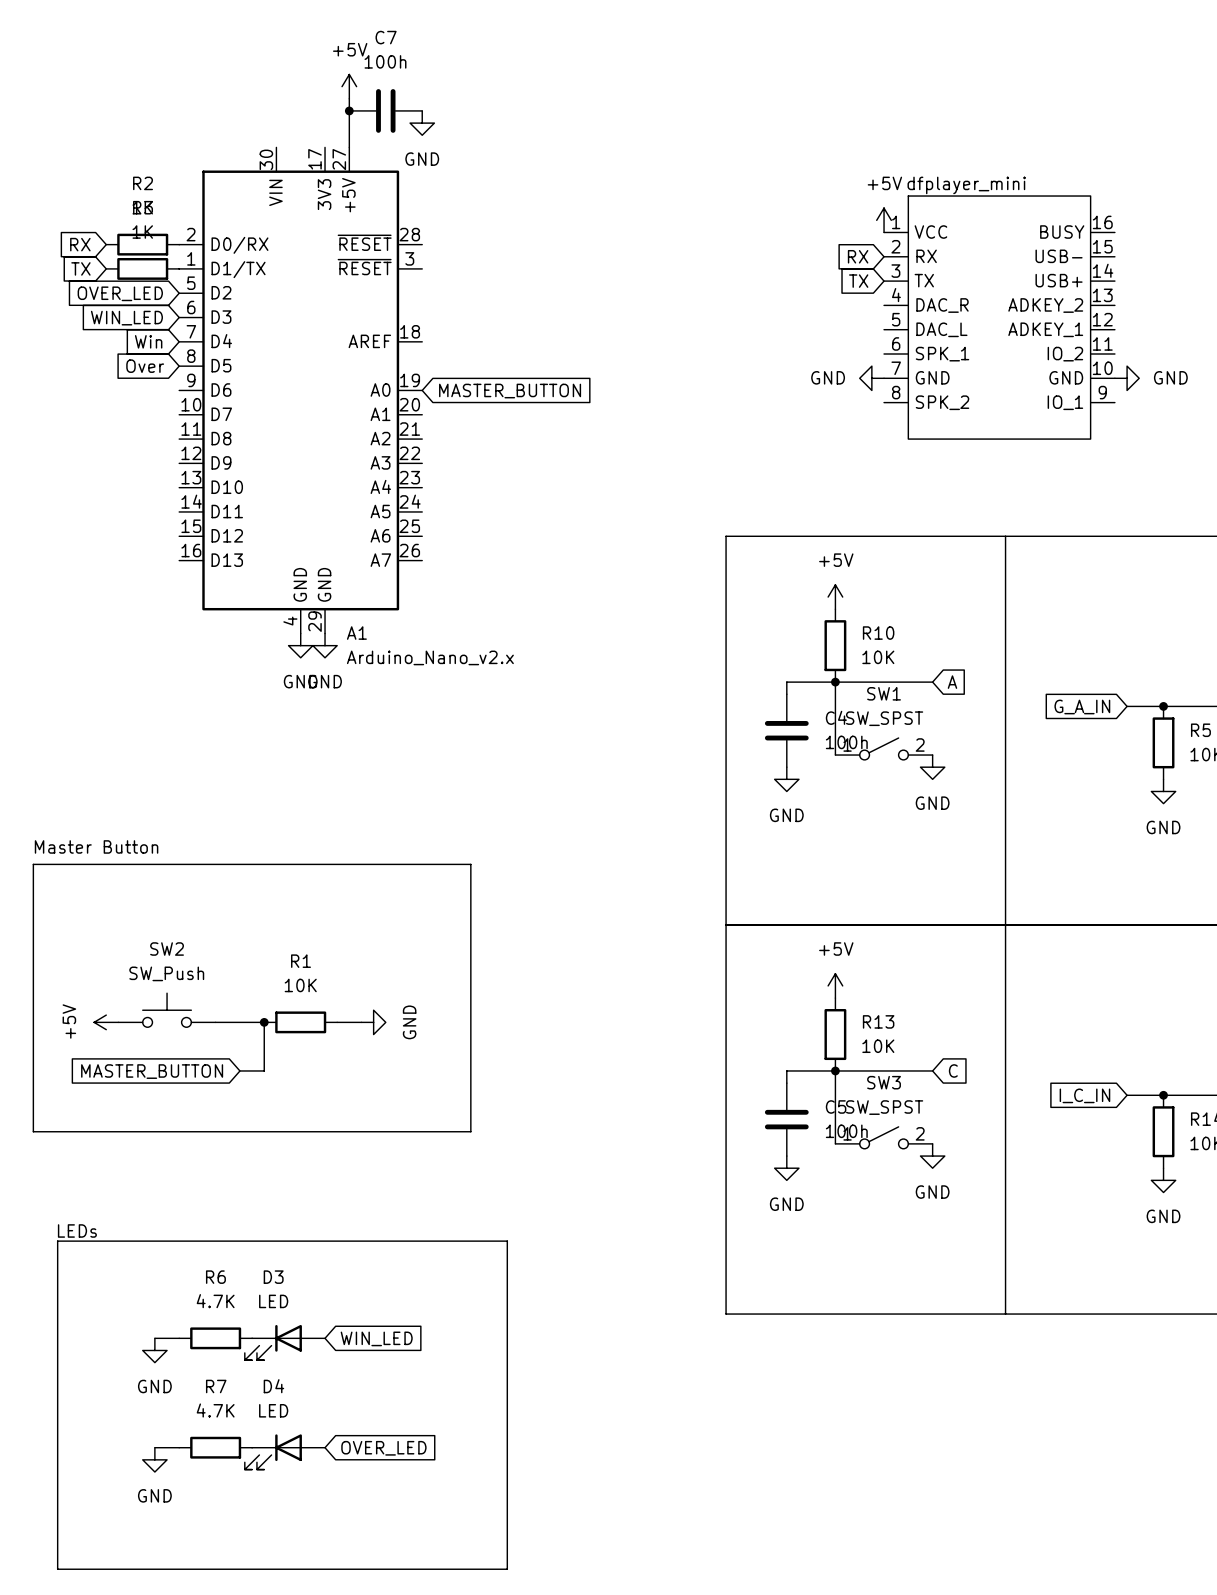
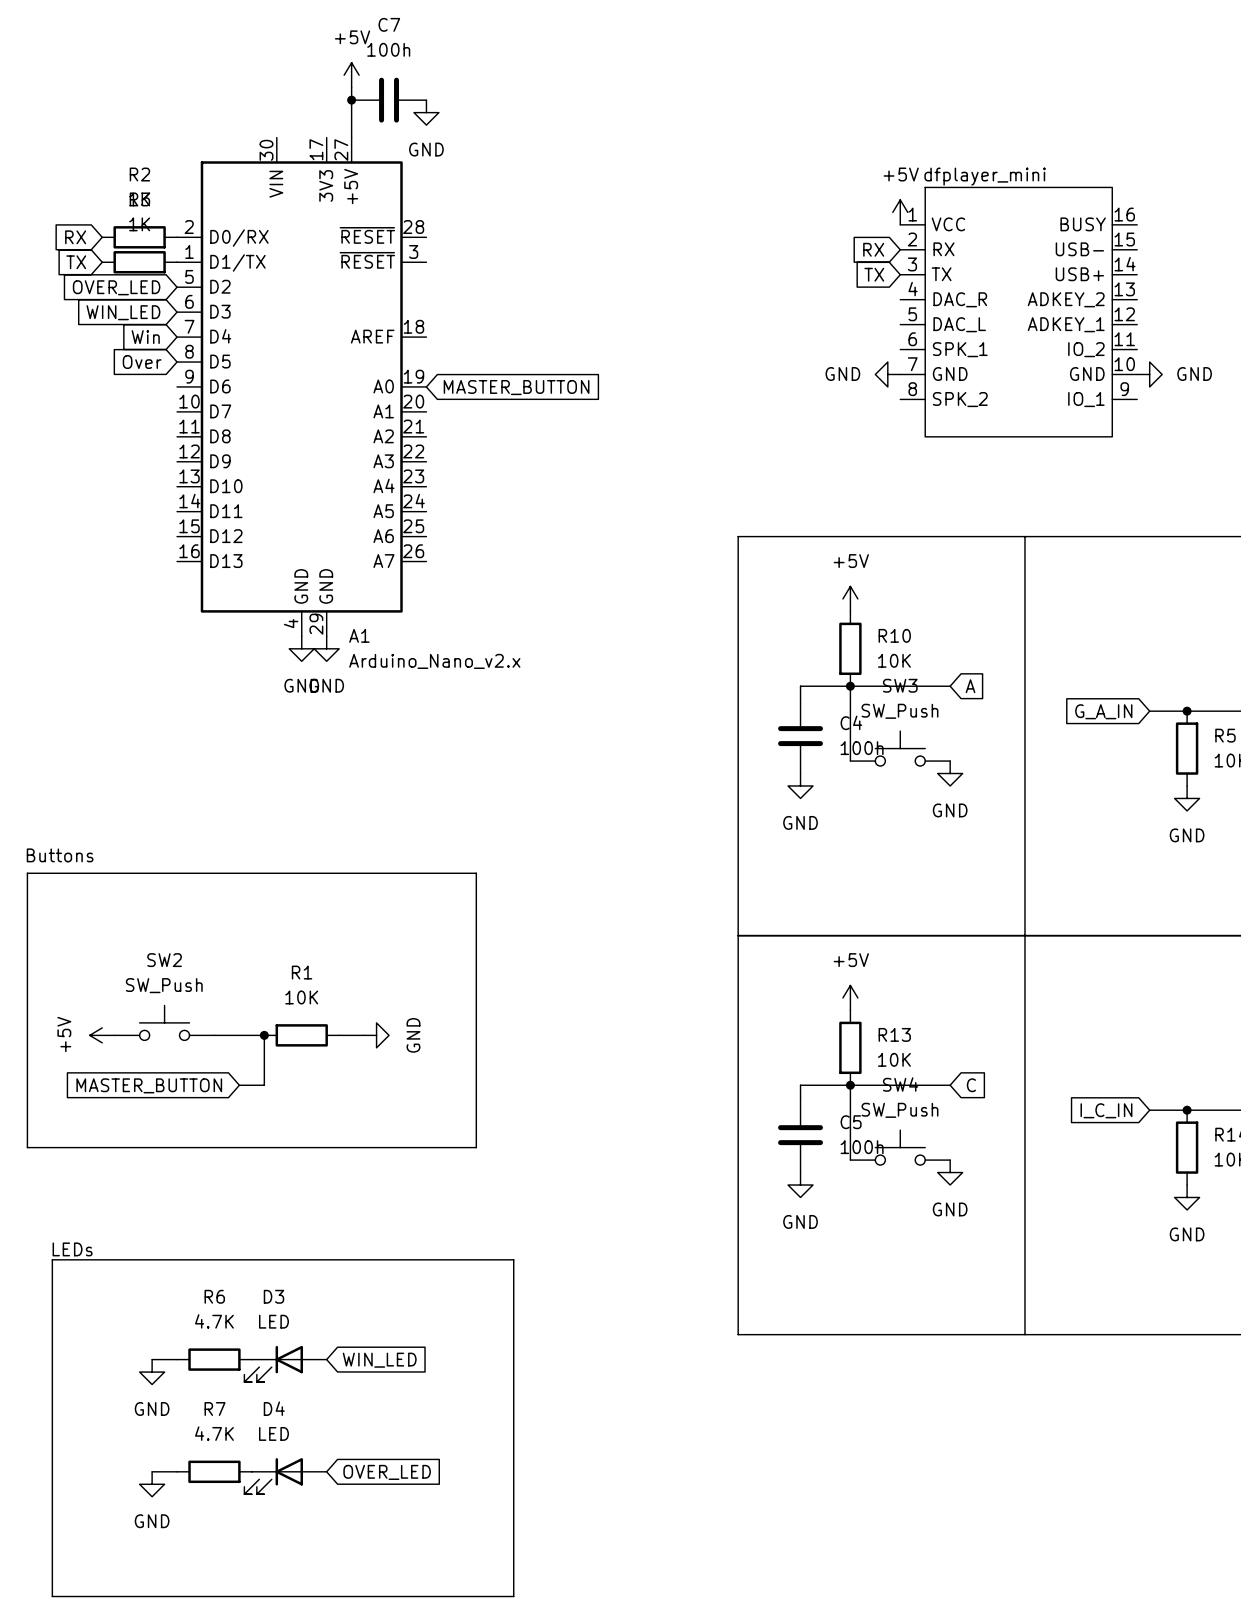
SW1: SW_SPST (884, 748) -> none
text: none -> Buttons (60, 855)
text: Master Button (96, 846) -> none
SW3 value: SW_SPST (884, 1107) -> SW_Push (899, 711)
SW3 symbol: [835, 1126, 933, 1149] -> [850, 731, 951, 767]
SW4: none -> SW_Push (900, 1147)

